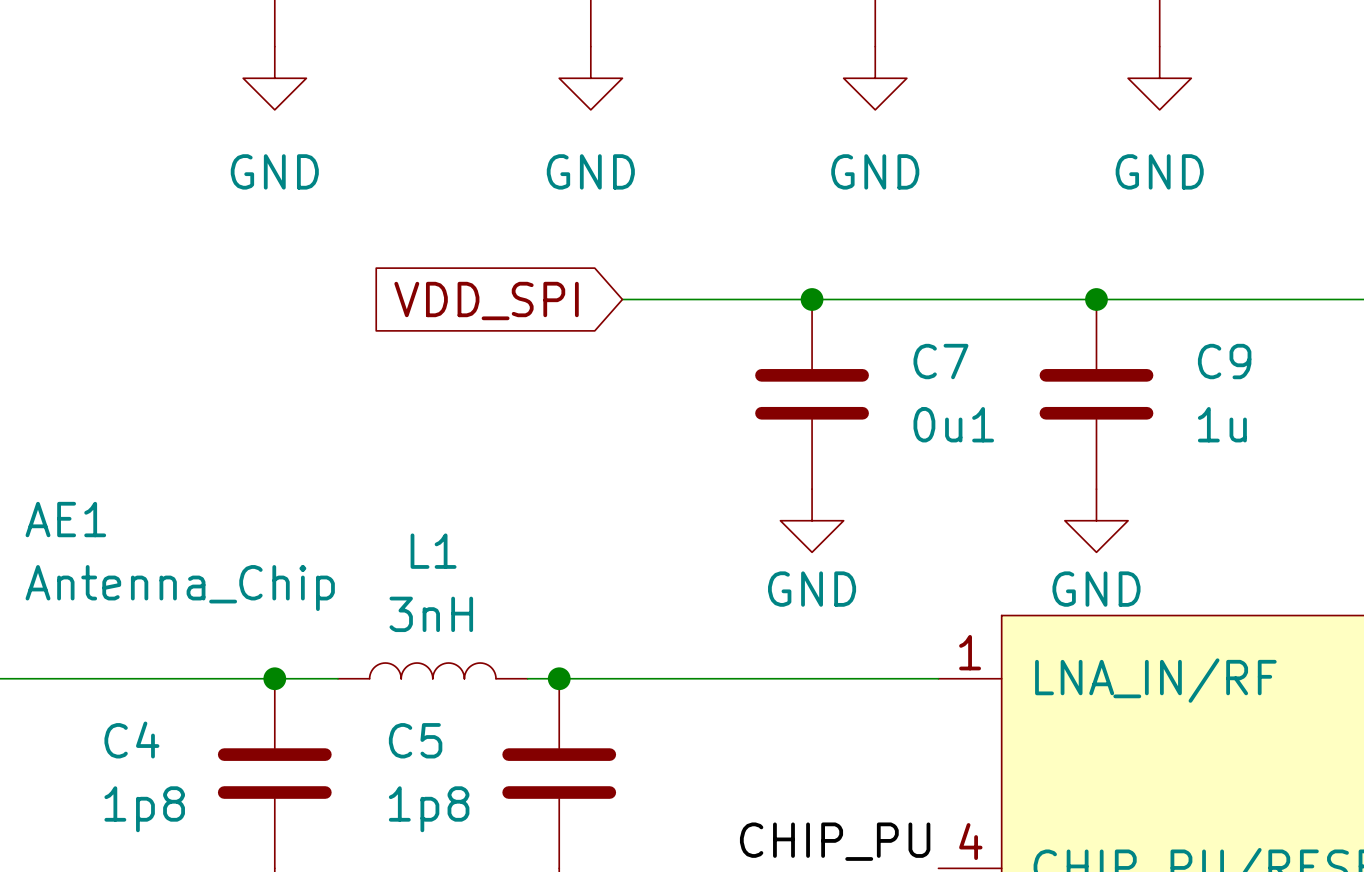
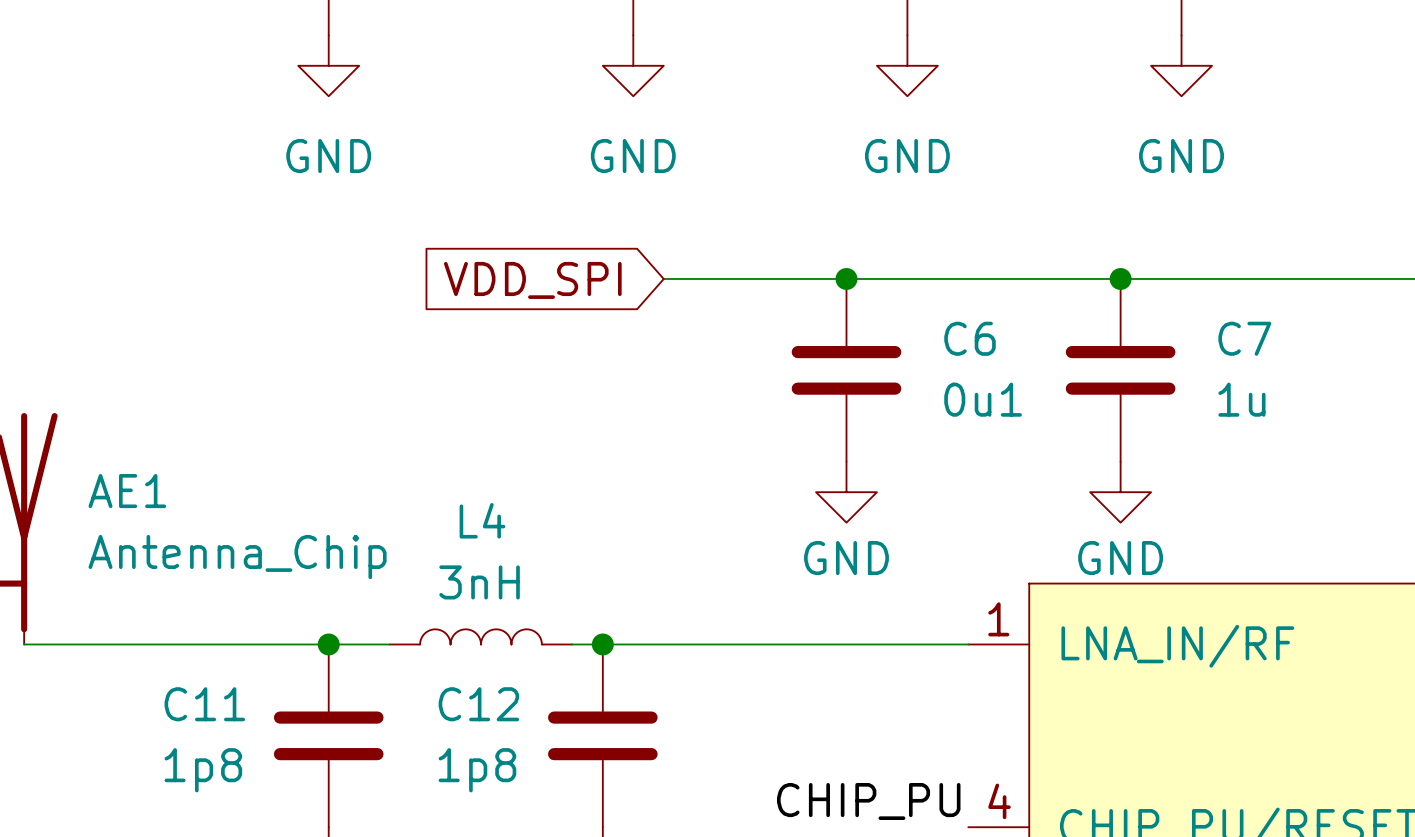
C7 name: C7 (940, 361) -> C6 (970, 338)
C9 name: C9 (1224, 361) -> C7 (1244, 338)
L1 name: L1 (433, 551) -> L4 (482, 520)
C4 name: C4 (131, 740) -> C11 (204, 704)
C5 name: C5 (415, 740) -> C12 (478, 704)

